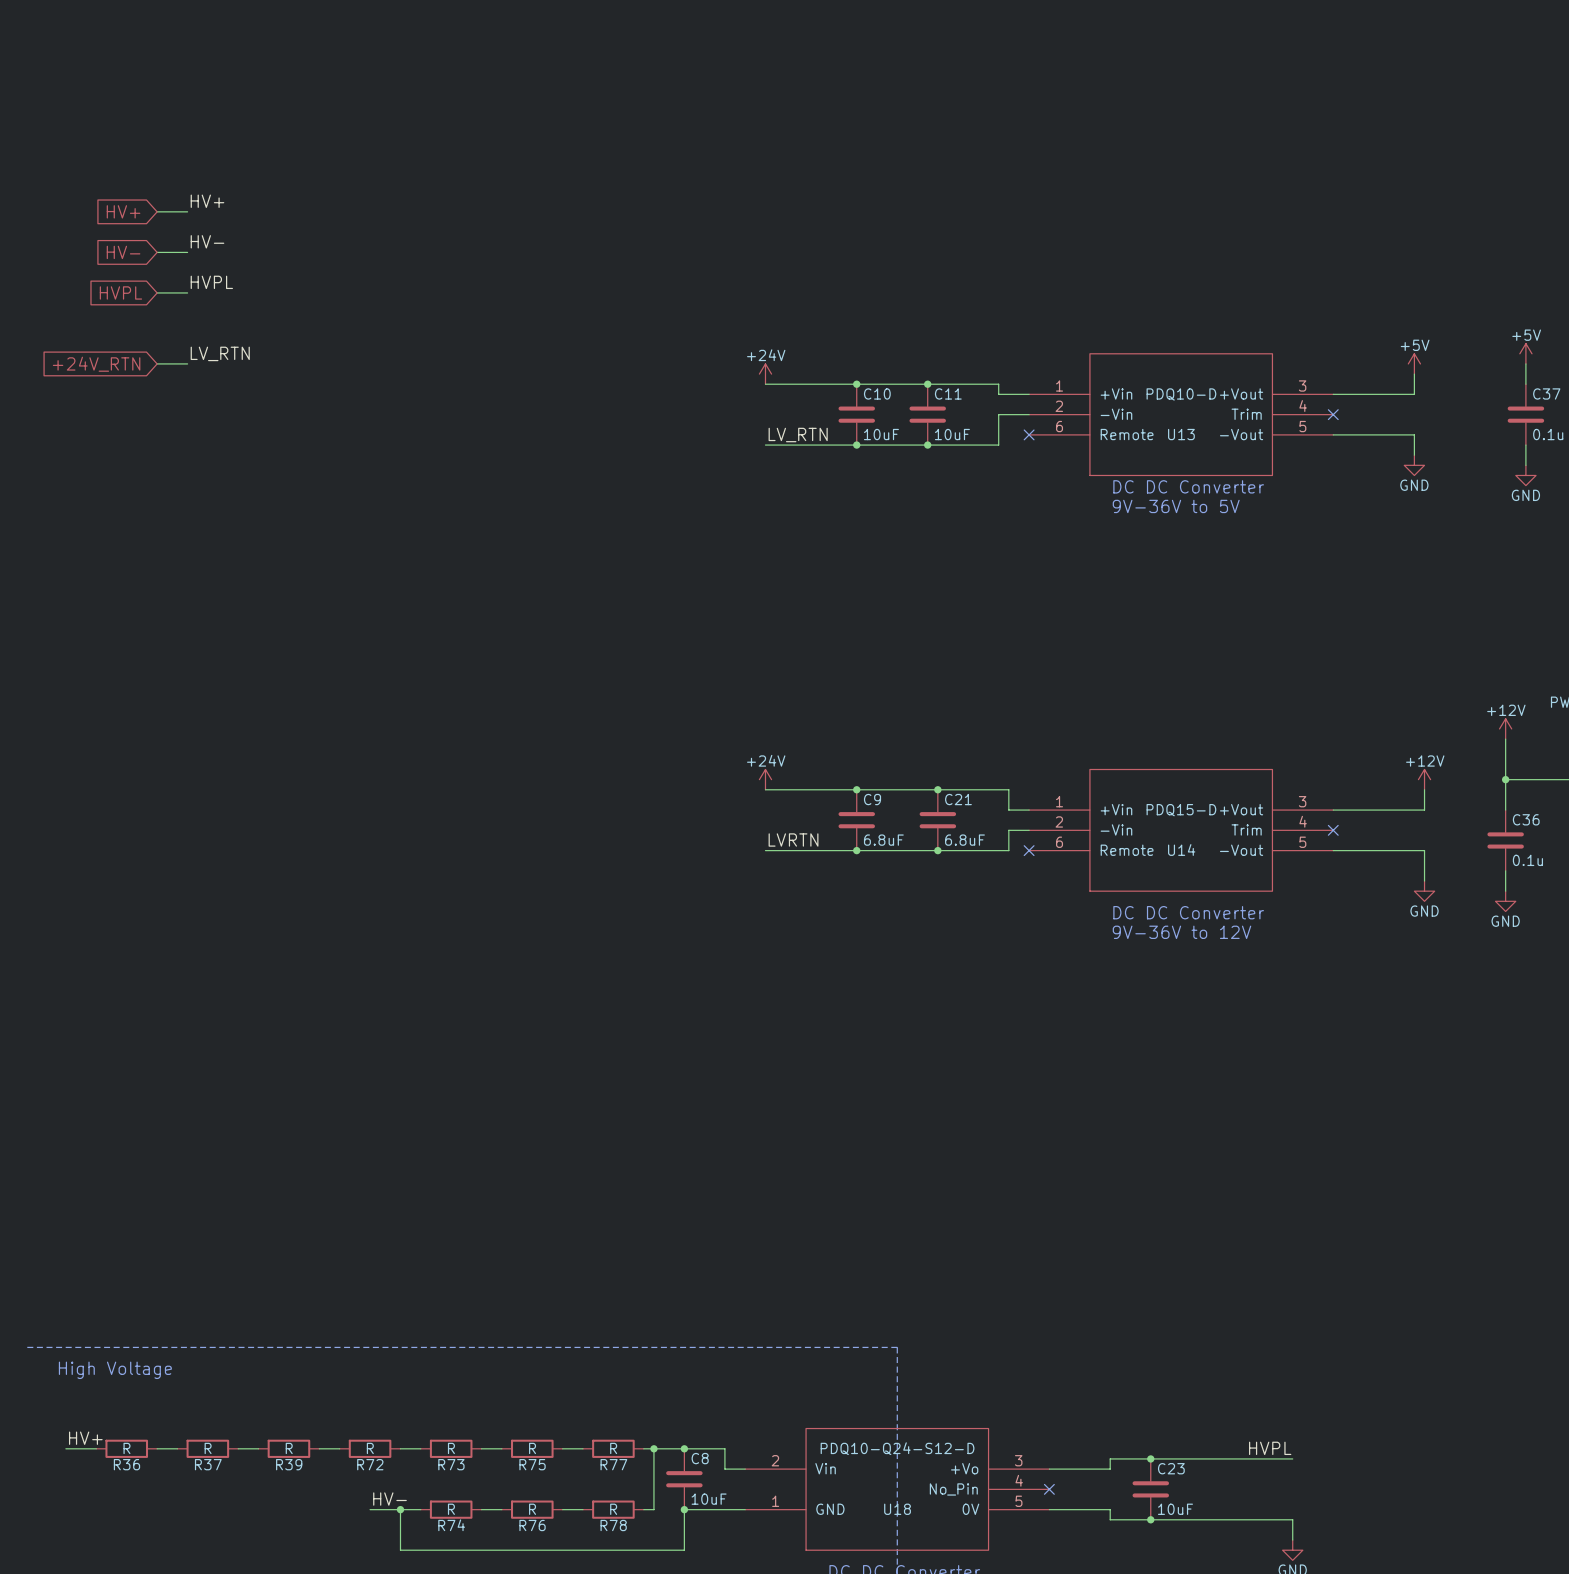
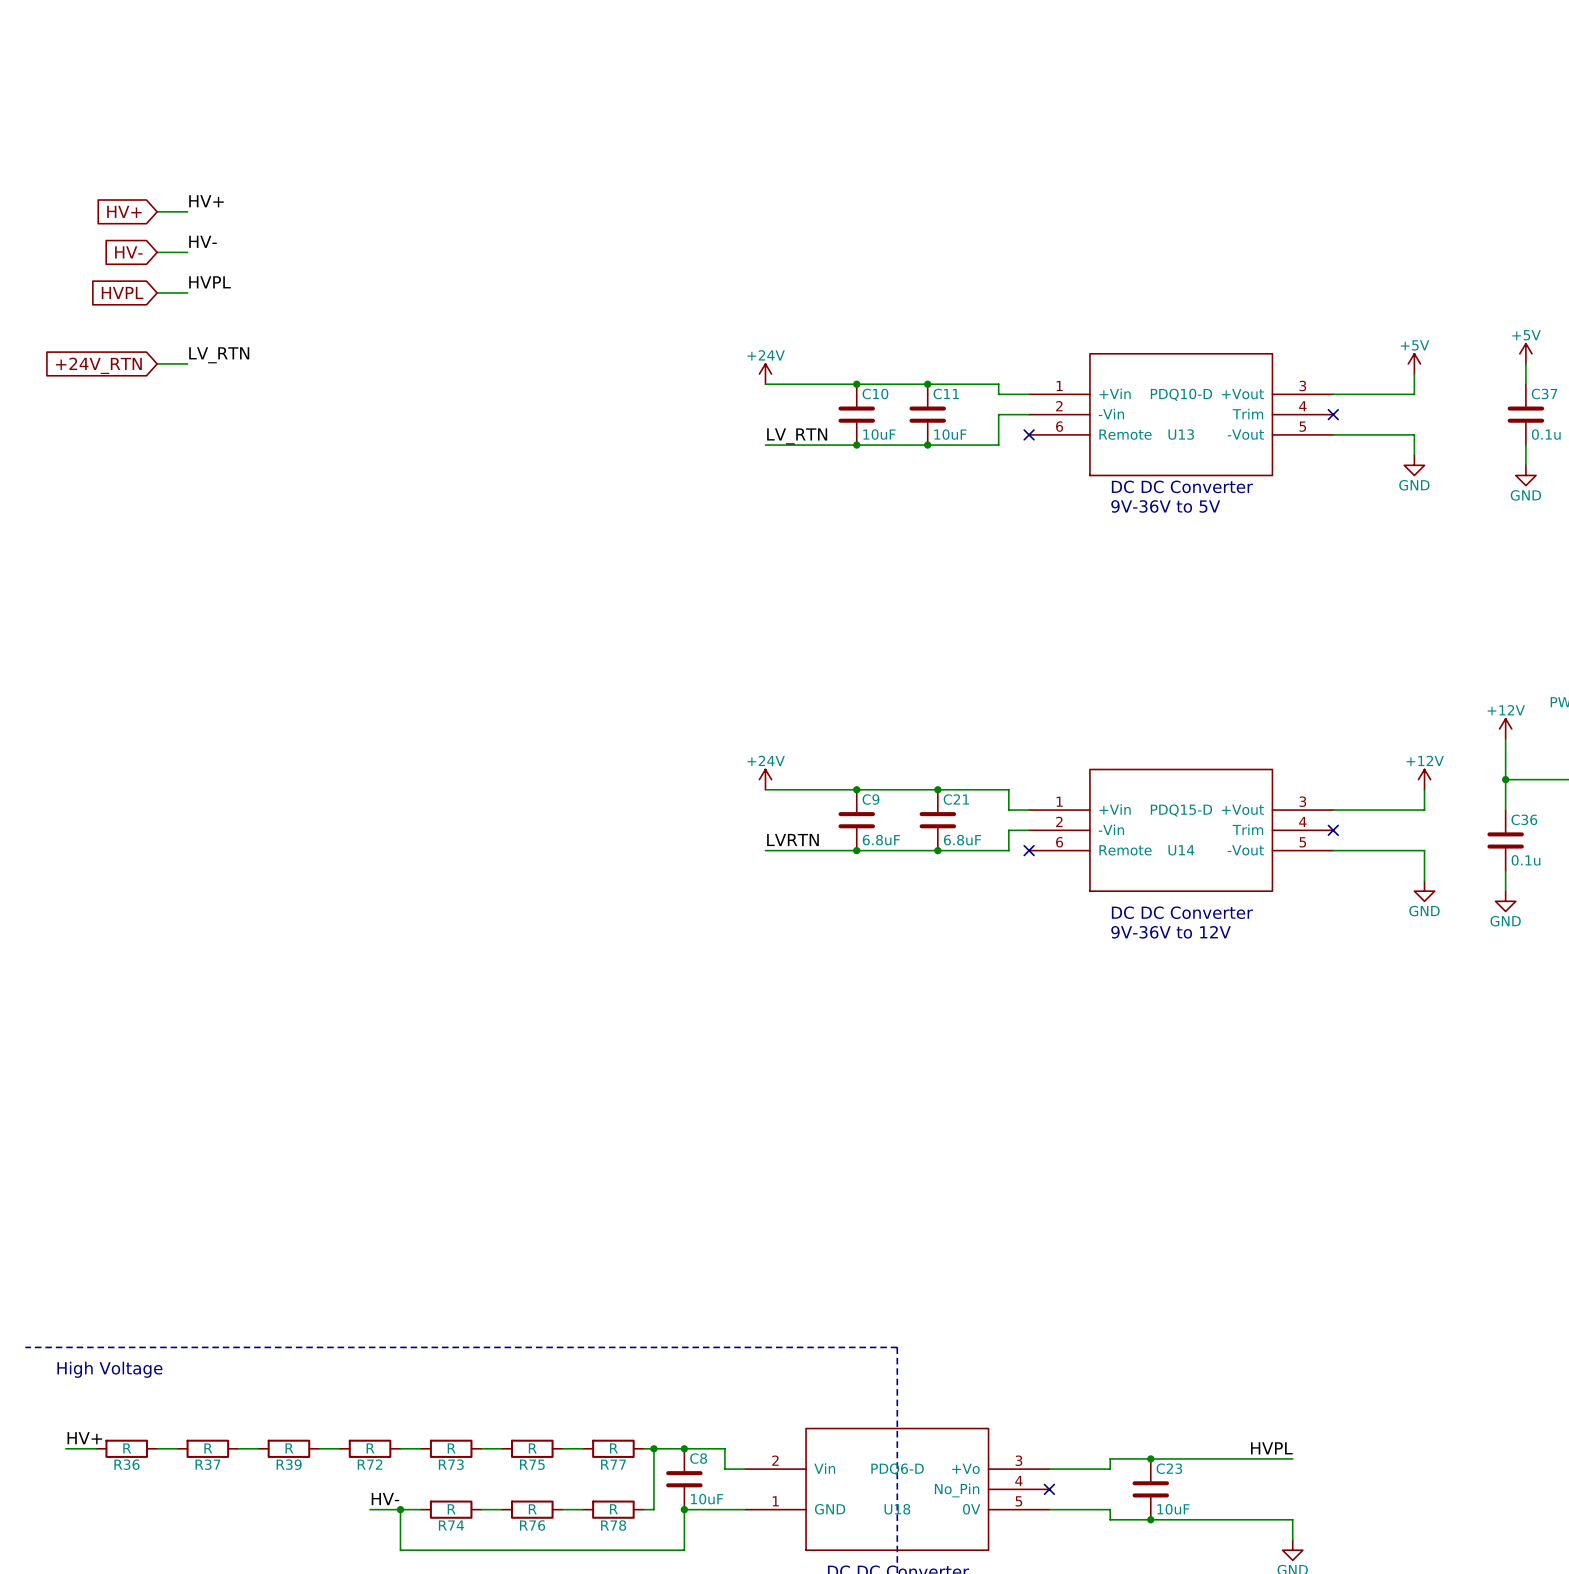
U18 value: PDQ10-Q24-S12-D (897, 1448) -> PDQ6-D (897, 1469)

